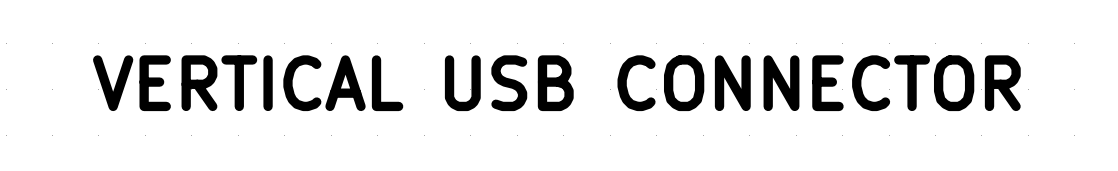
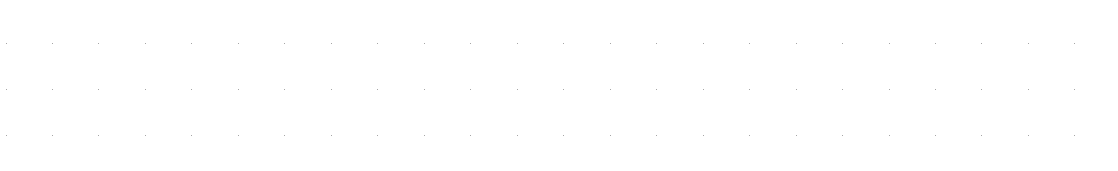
text: VERTICAL USB CONNECTOR (556, 83) -> none

